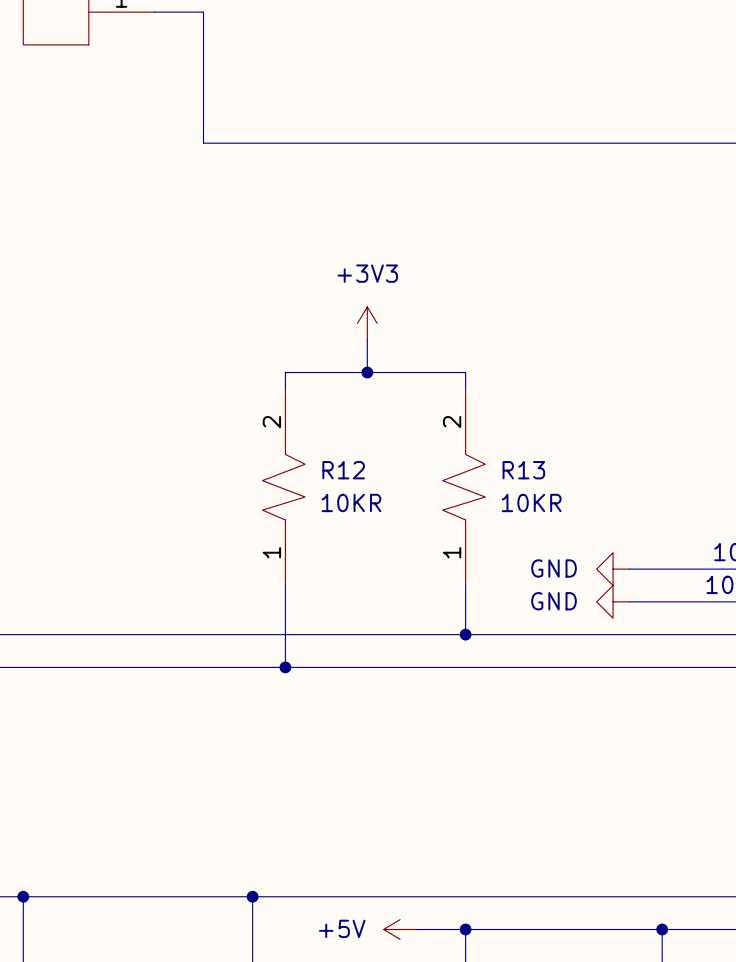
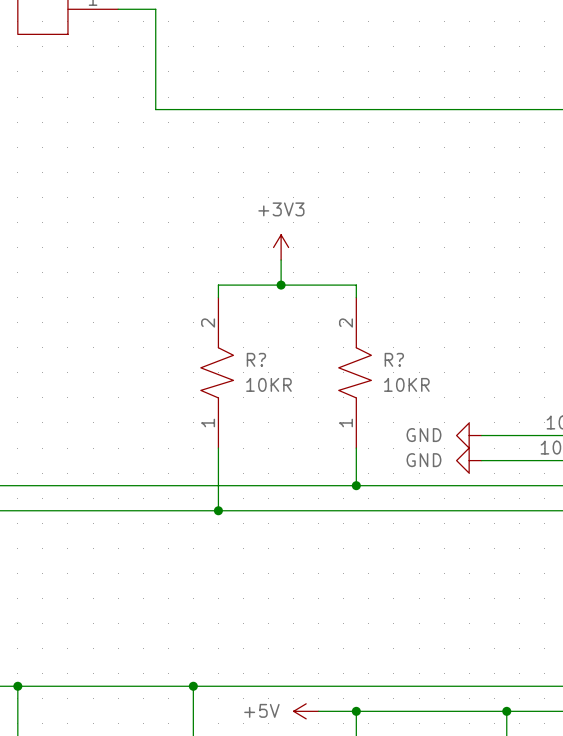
R12 name: R12 (343, 470) -> R? (256, 359)
R13 name: R13 (523, 470) -> R? (394, 359)

